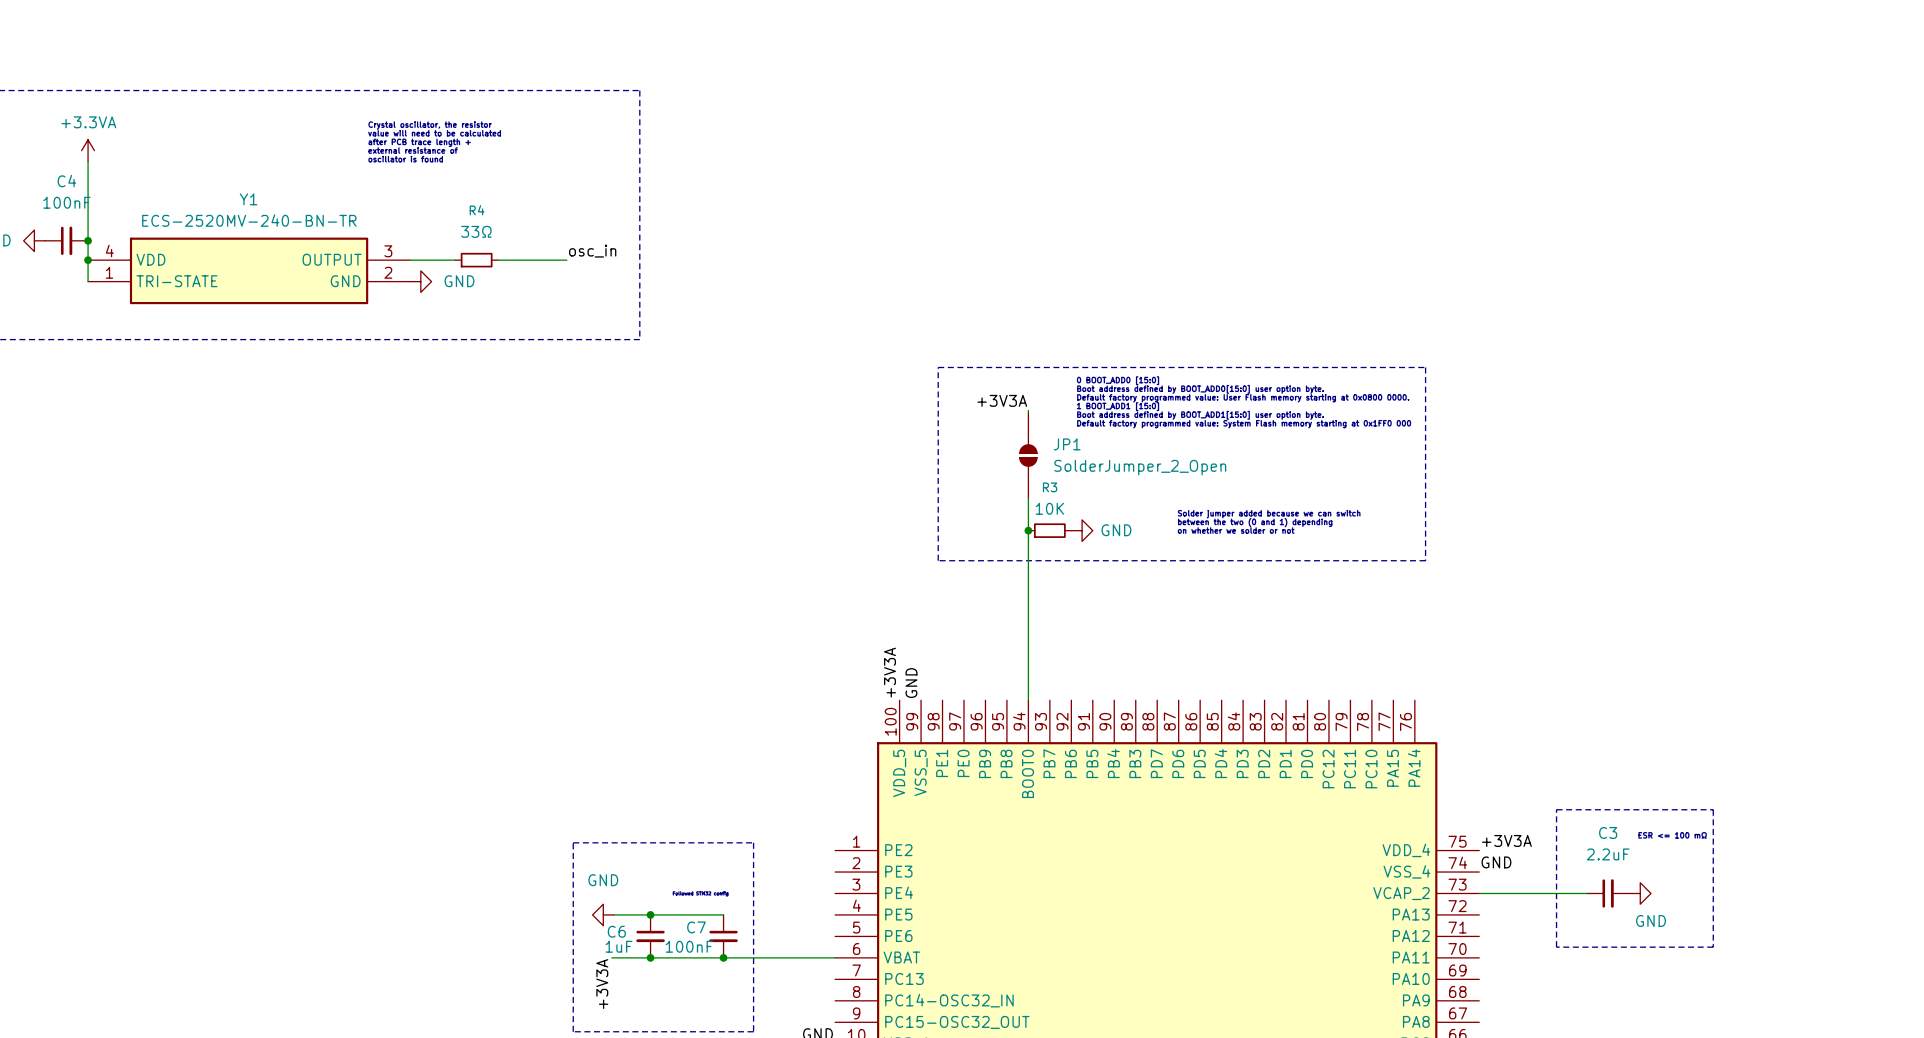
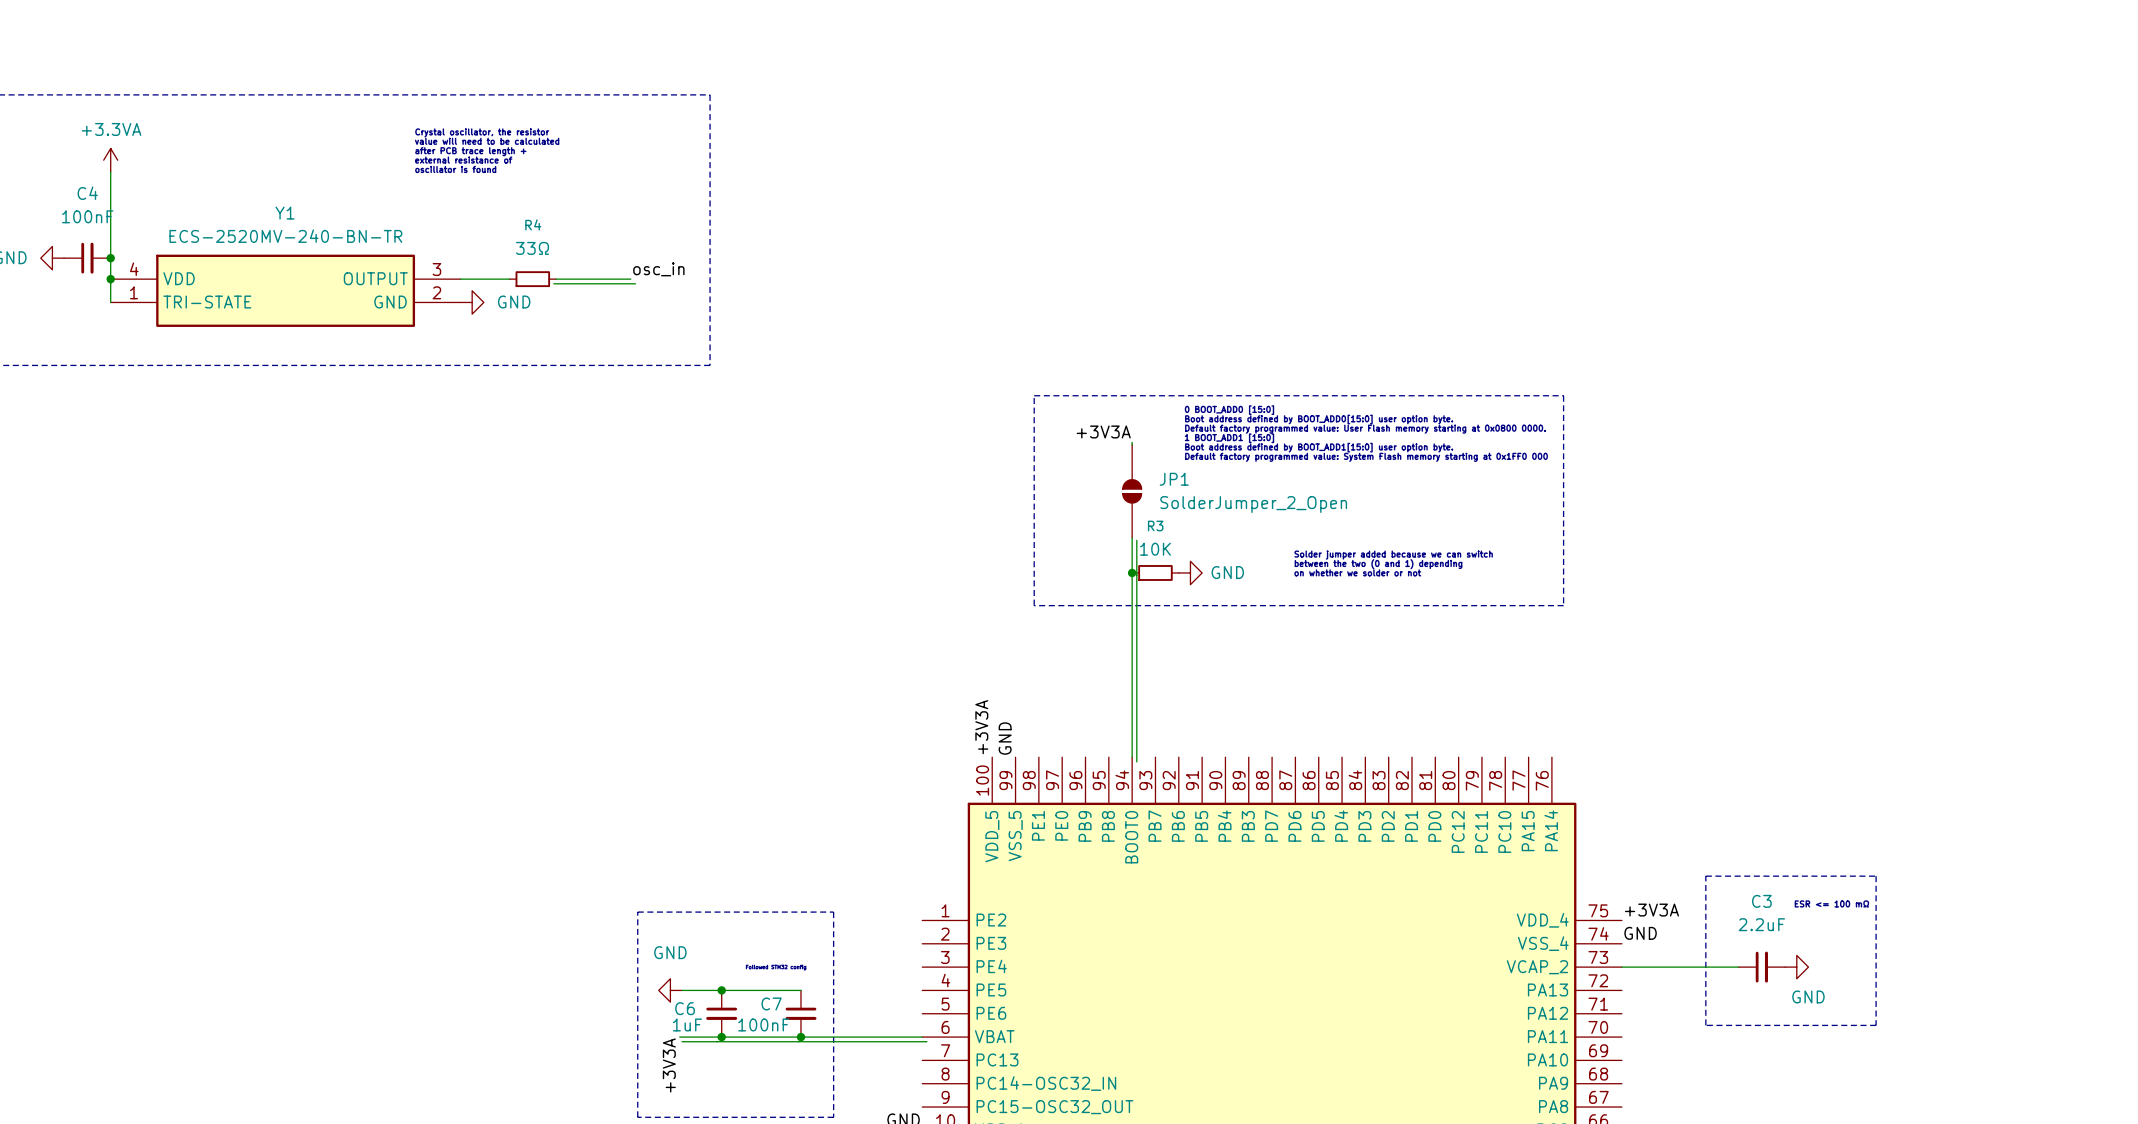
wire: none -> (553, 283) (635, 283)
wire: none -> (1136, 540) (1136, 761)
wire: none -> (682, 1041) (926, 1041)

